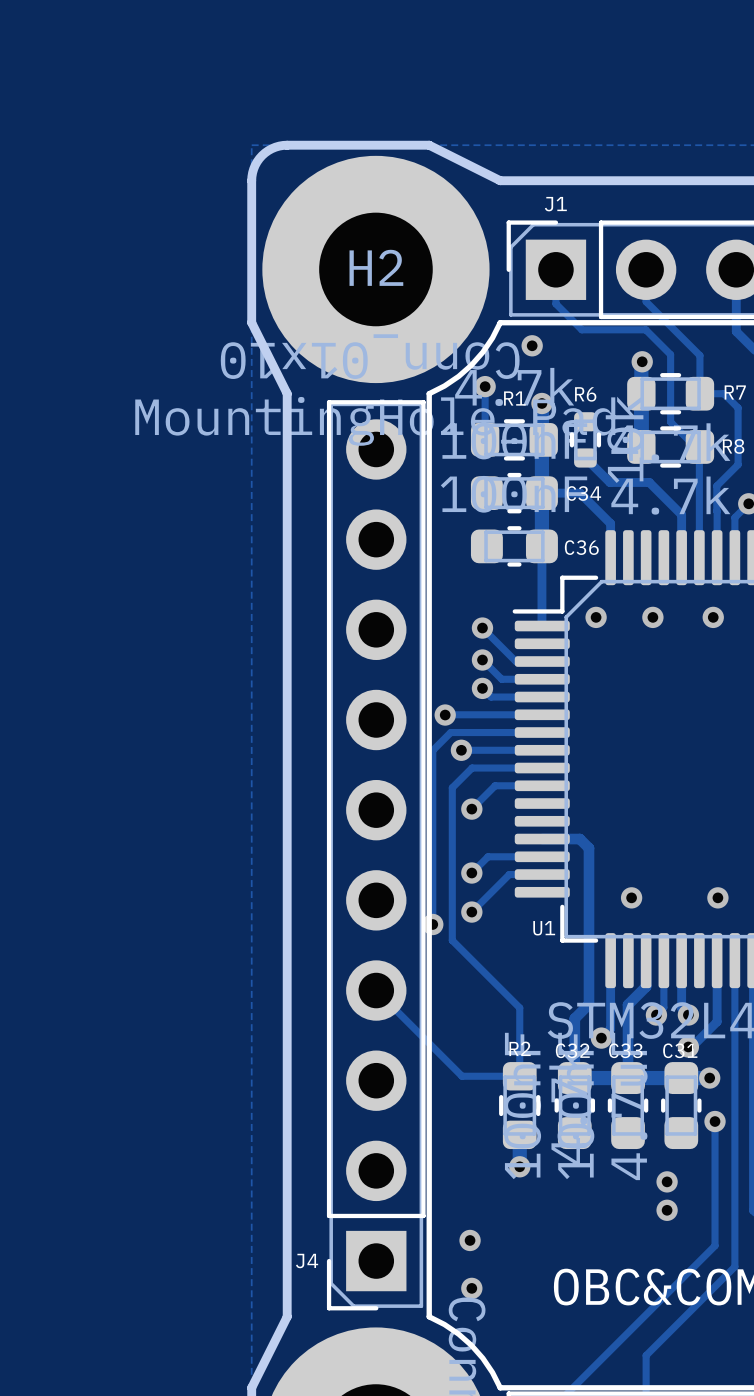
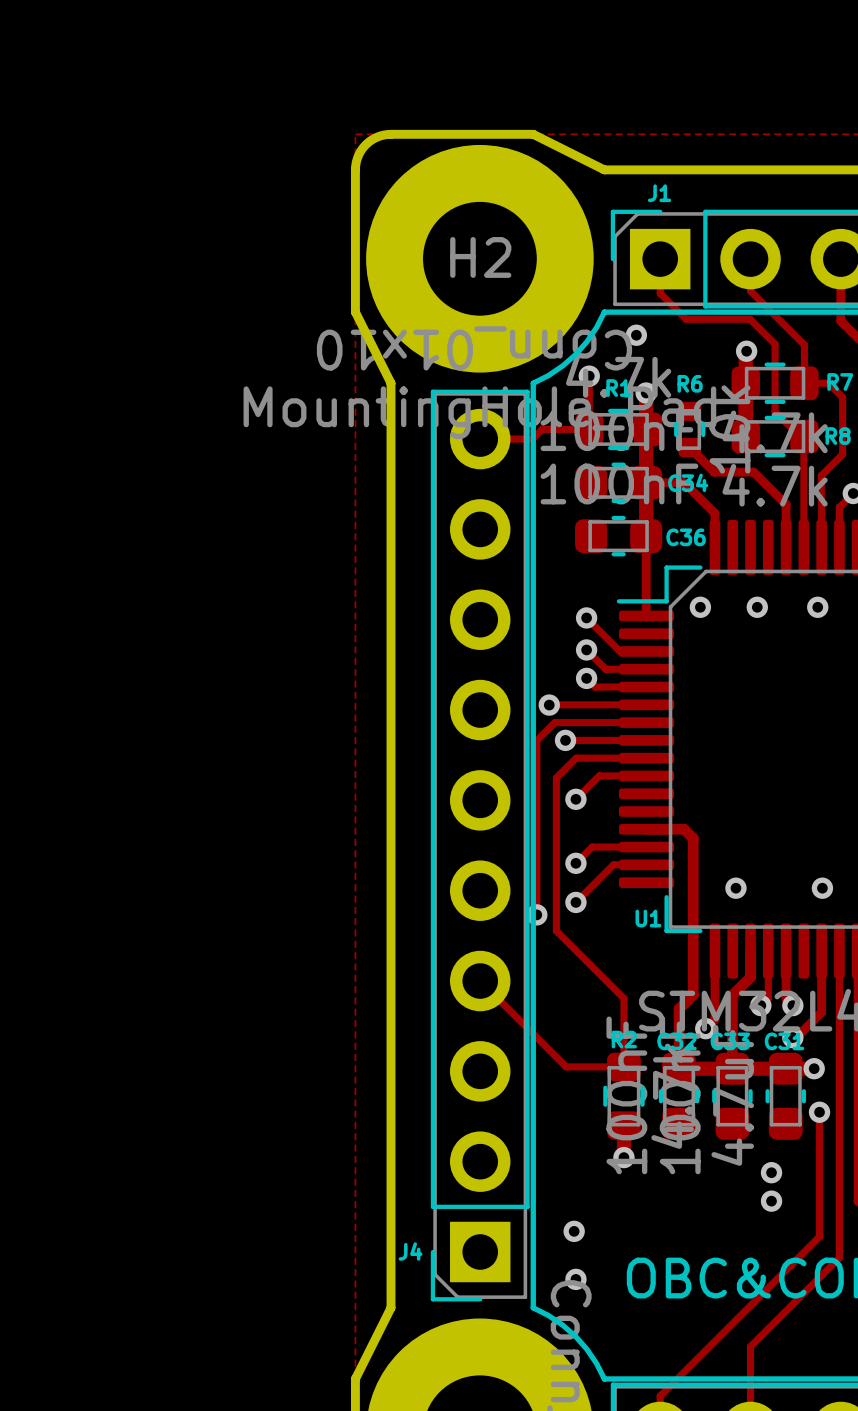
track: none -> (589, 429) (542, 429) (532, 439) (479, 439)

